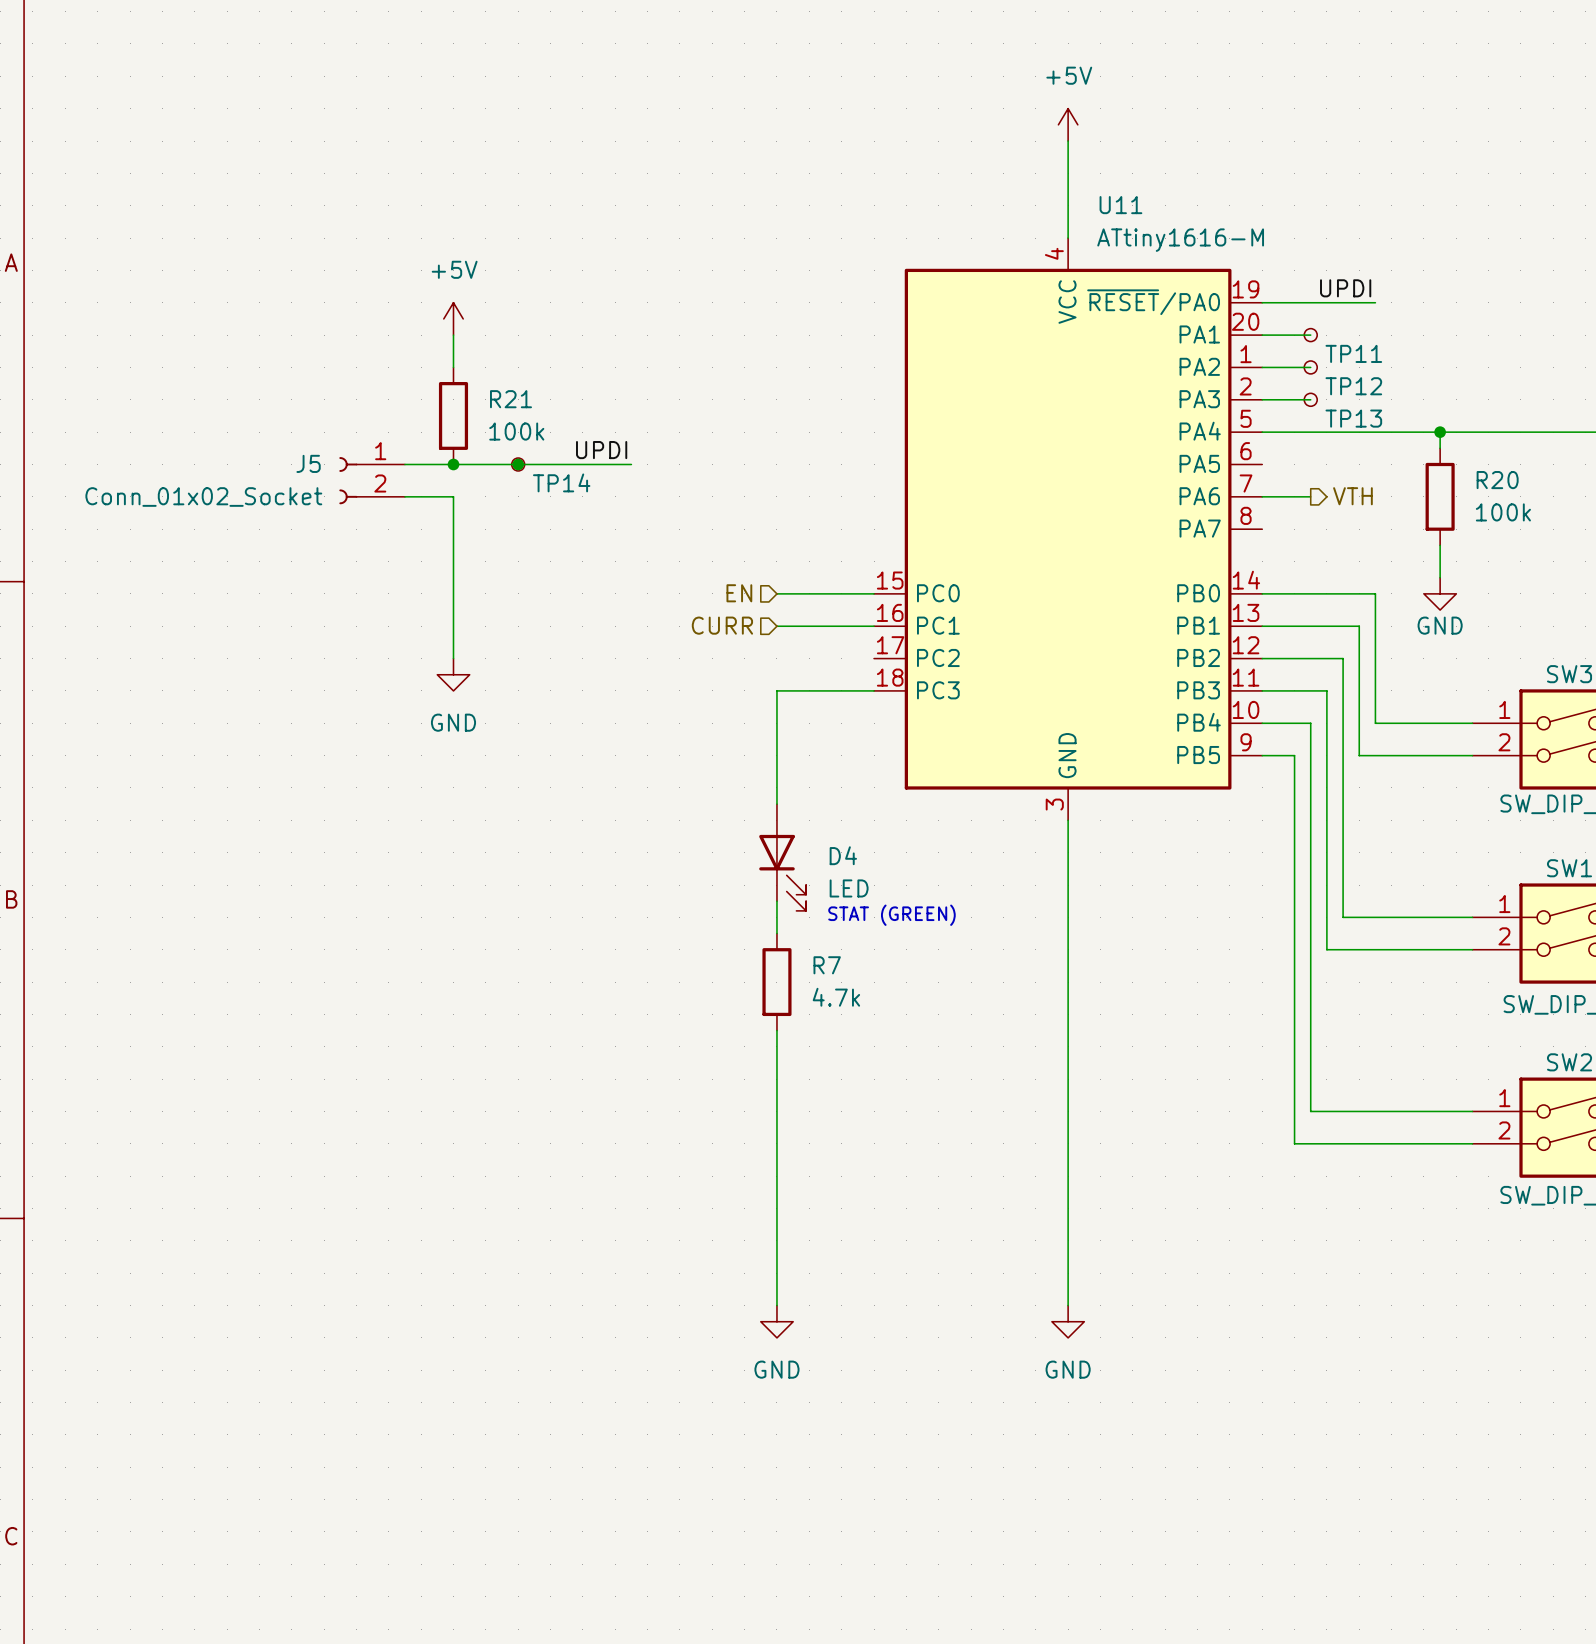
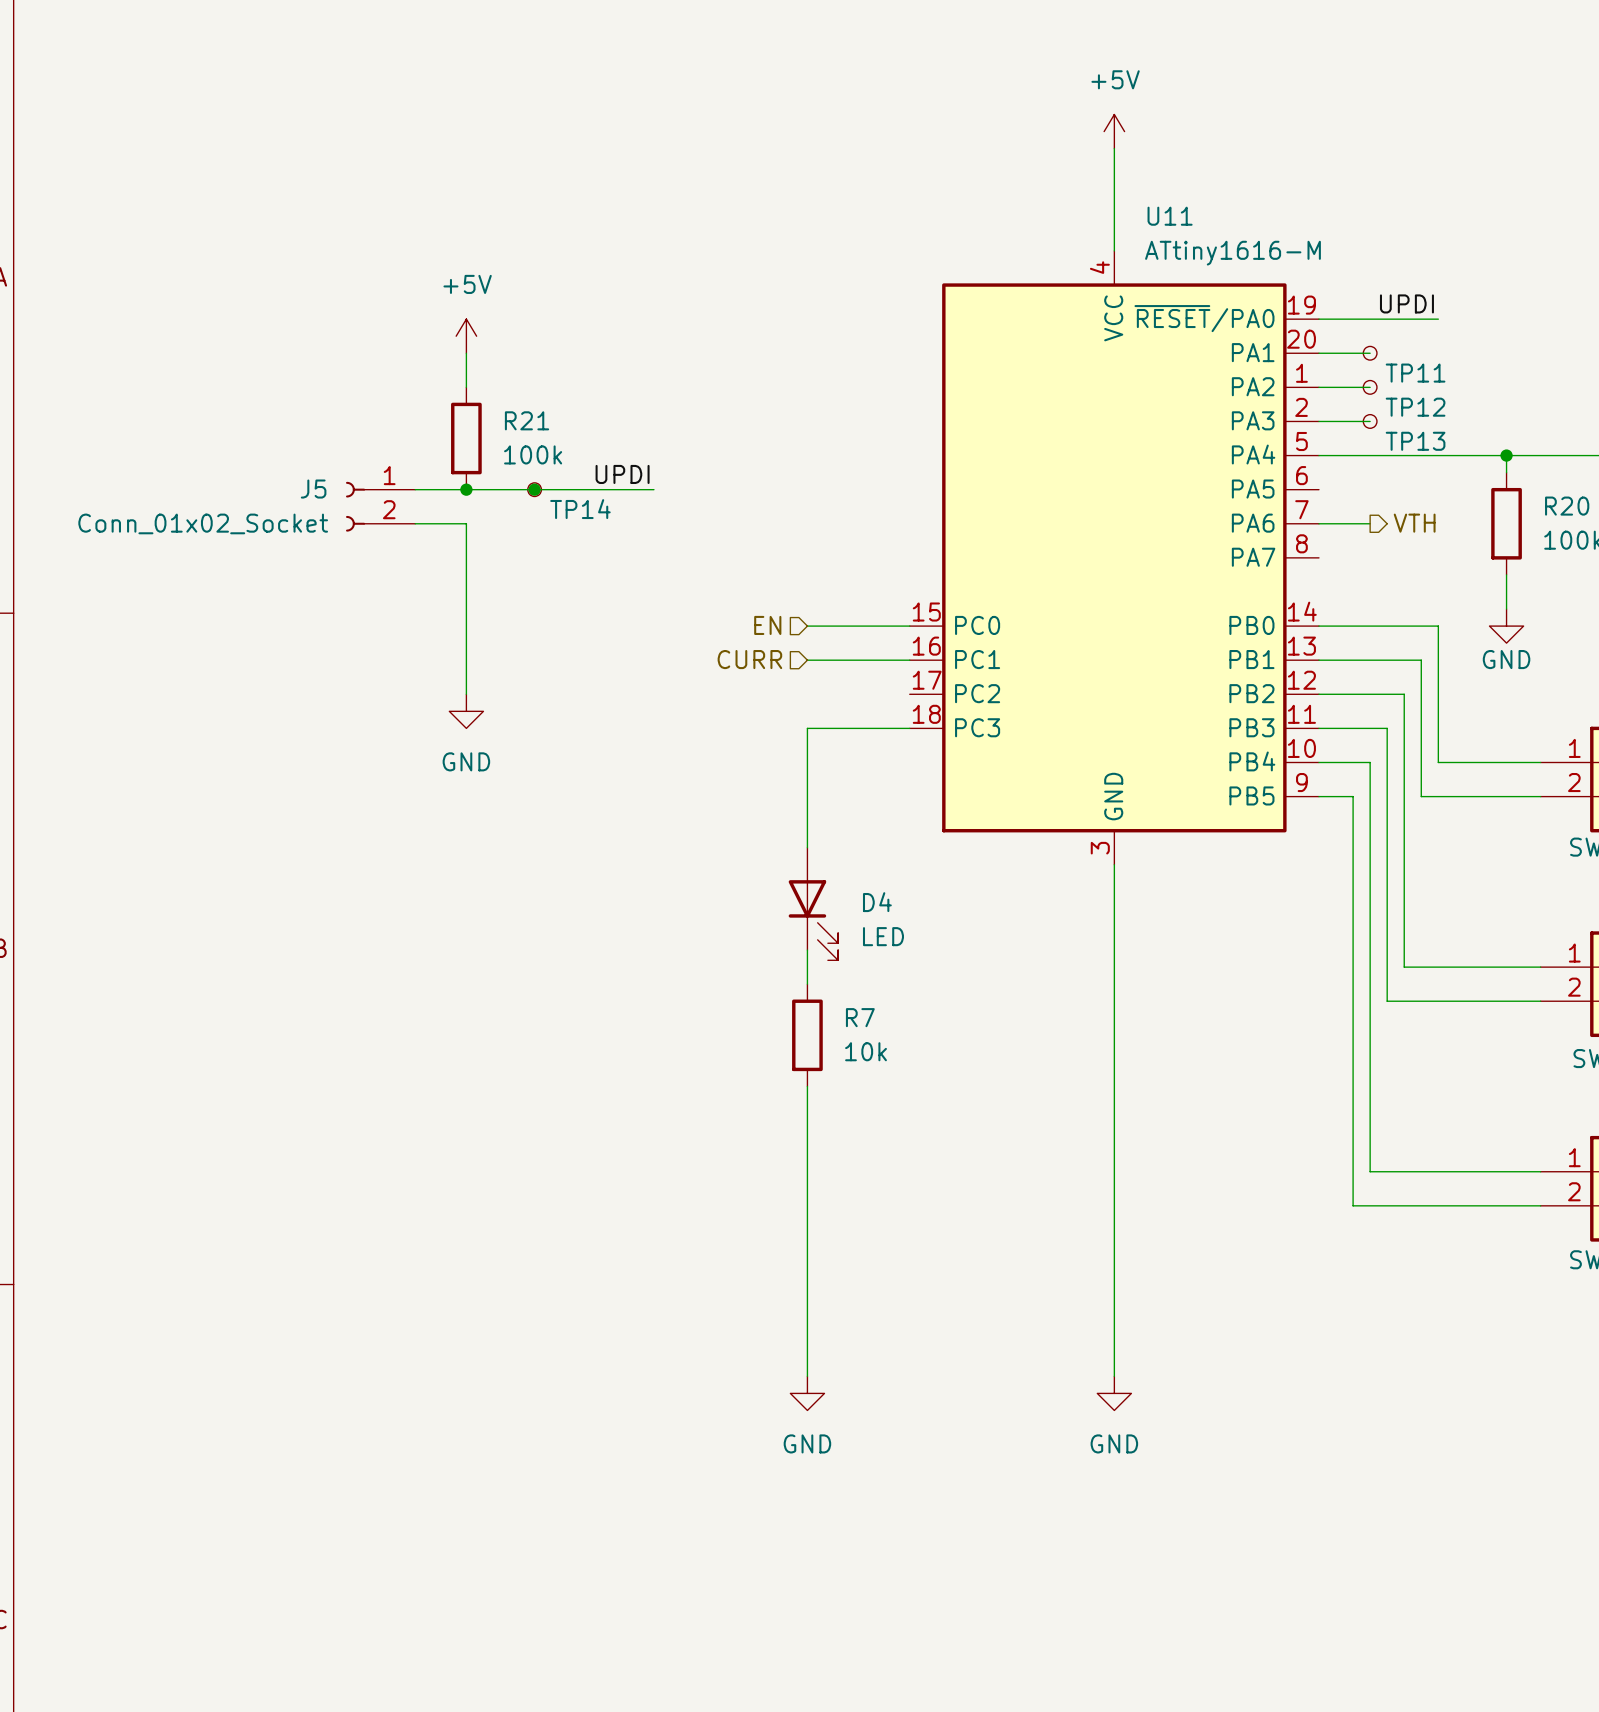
text: STAT (GREEN) (891, 915) -> none
R7 value: 4.7k (836, 997) -> 10k (866, 1051)

